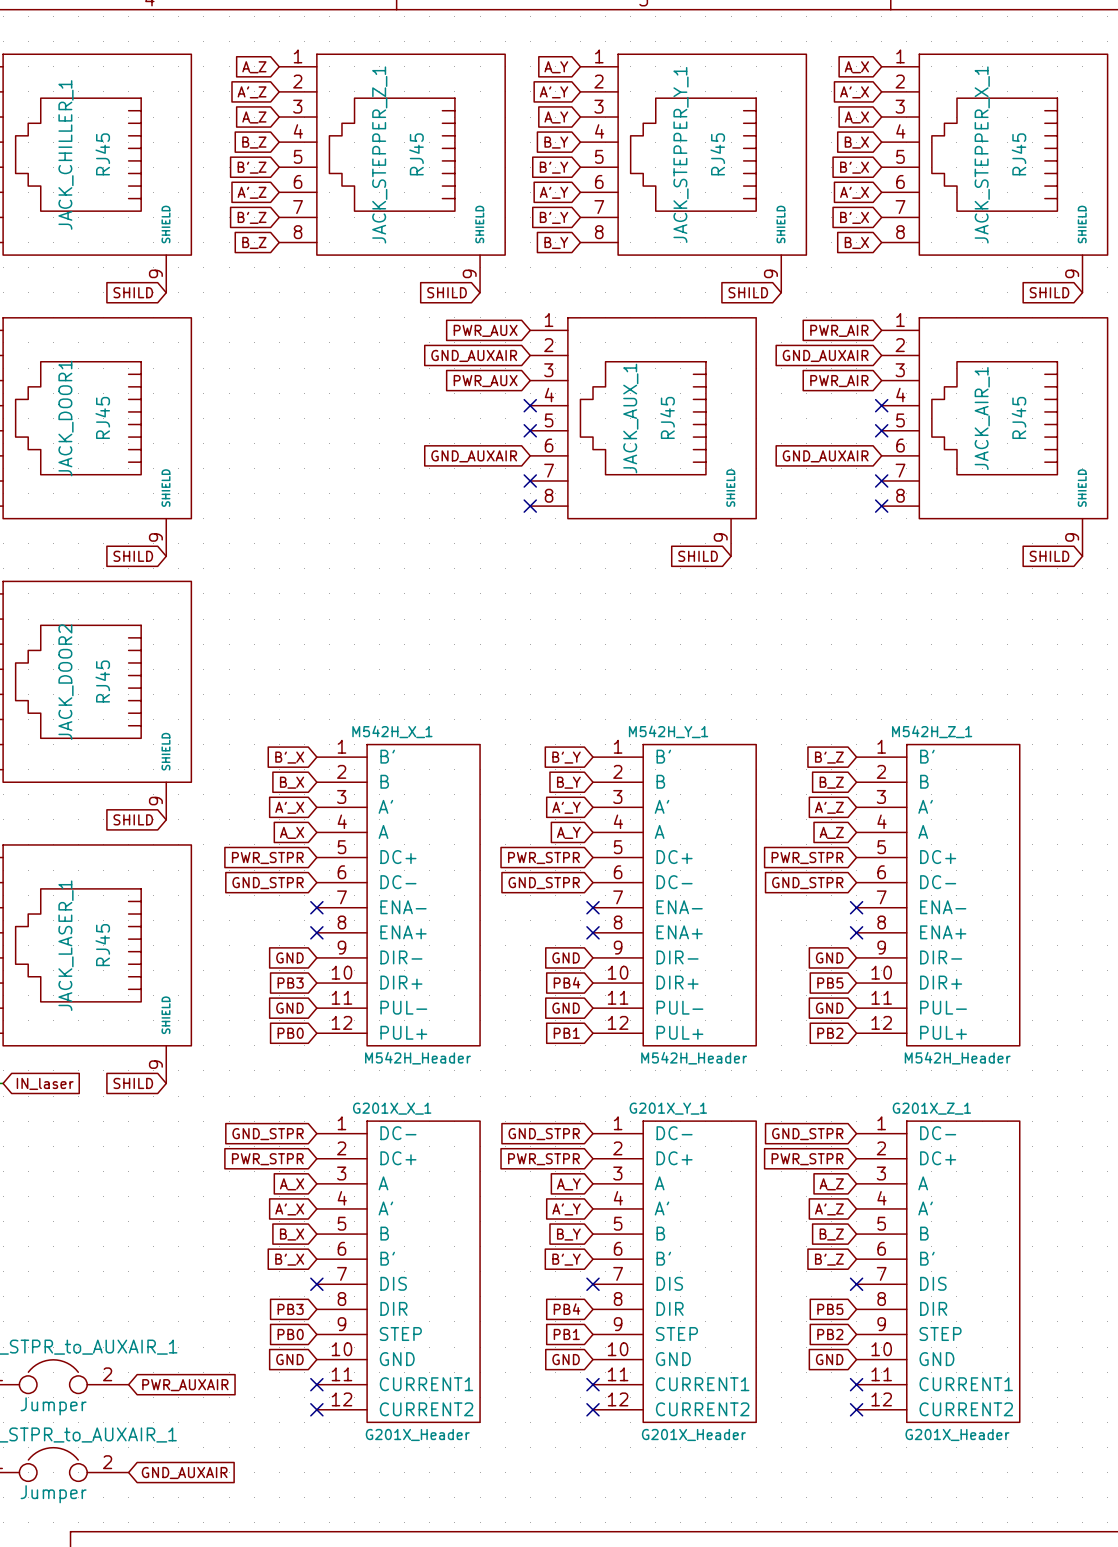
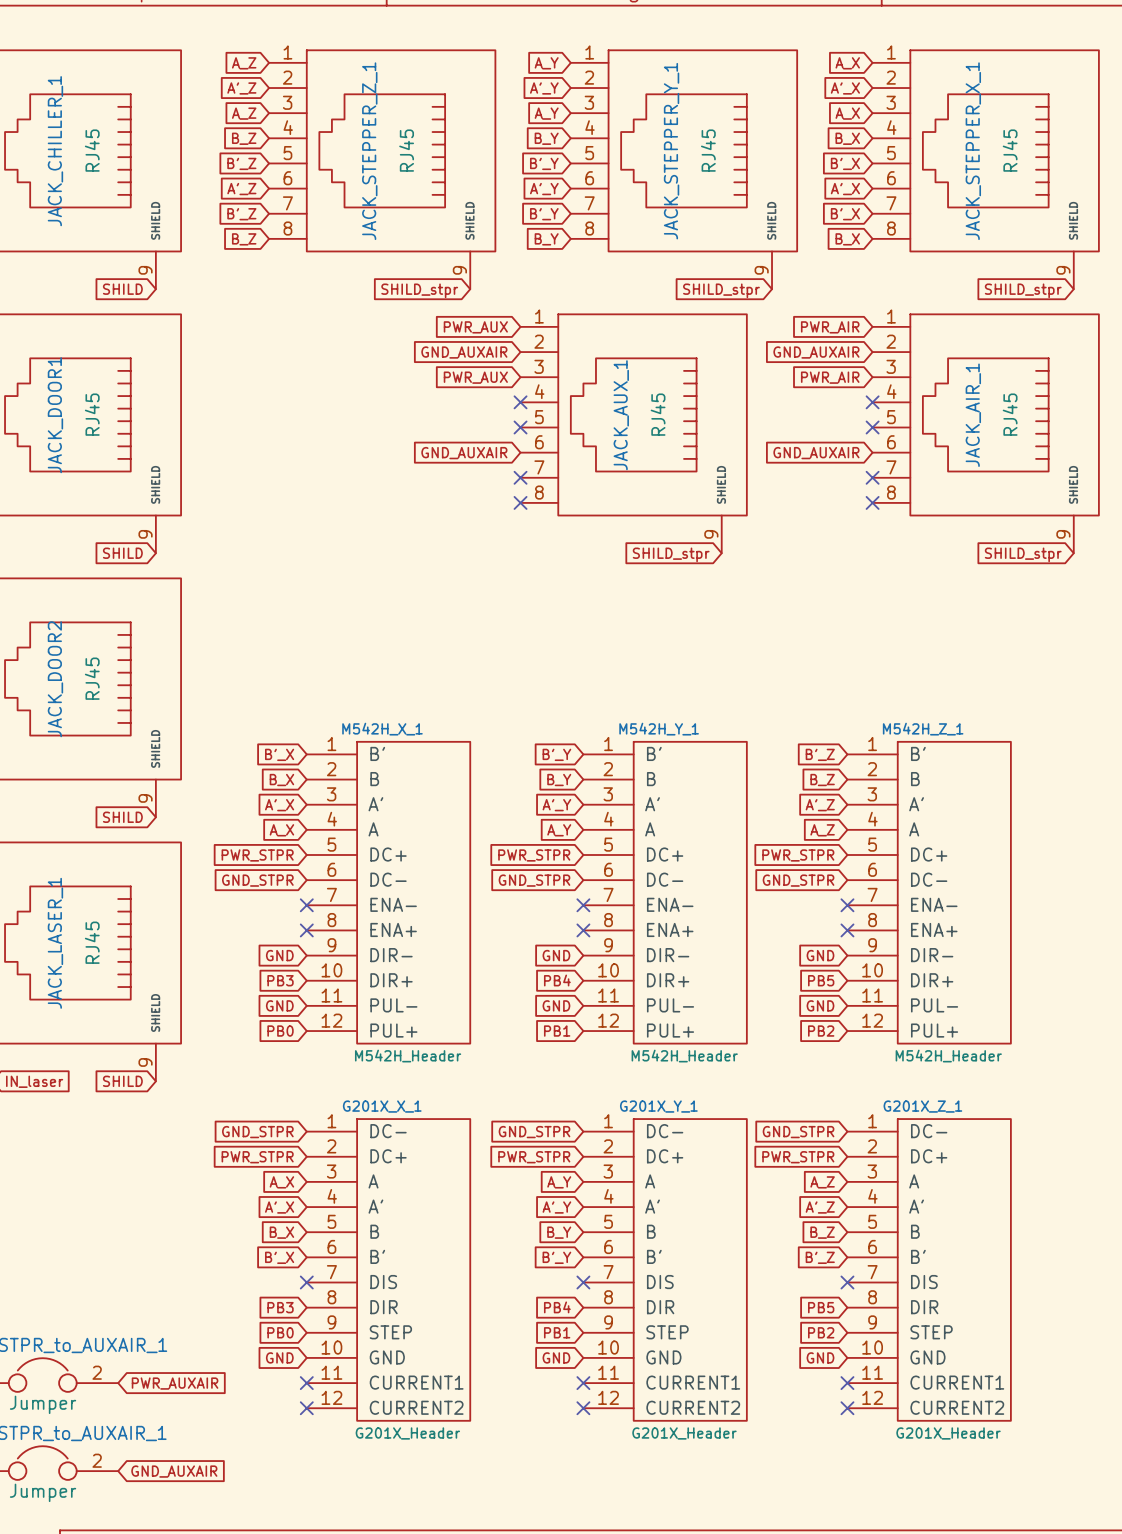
global label: SHILD (447, 292) -> SHILD_stpr (419, 290)
global label: SHILD (748, 292) -> SHILD_stpr (721, 290)
global label: SHILD (1049, 292) -> SHILD_stpr (1023, 290)
global label: SHILD (698, 556) -> SHILD_stpr (671, 554)
global label: SHILD (1049, 556) -> SHILD_stpr (1023, 554)

